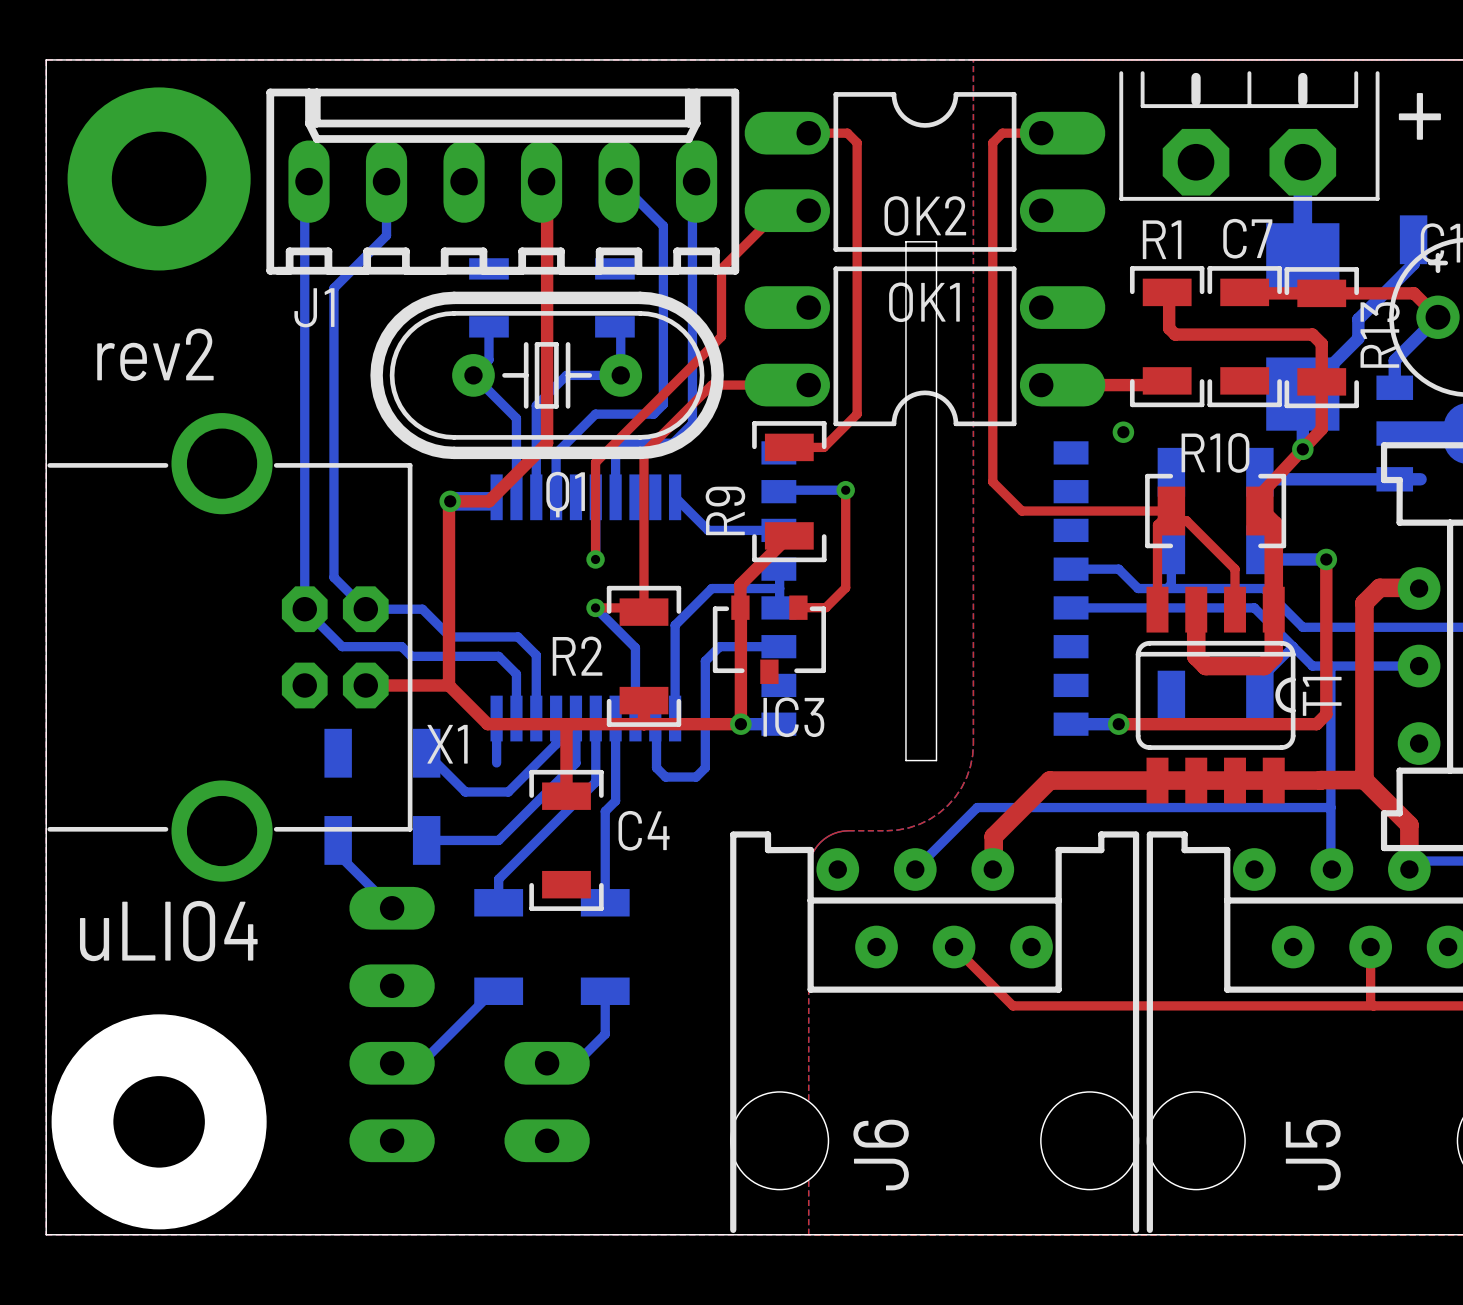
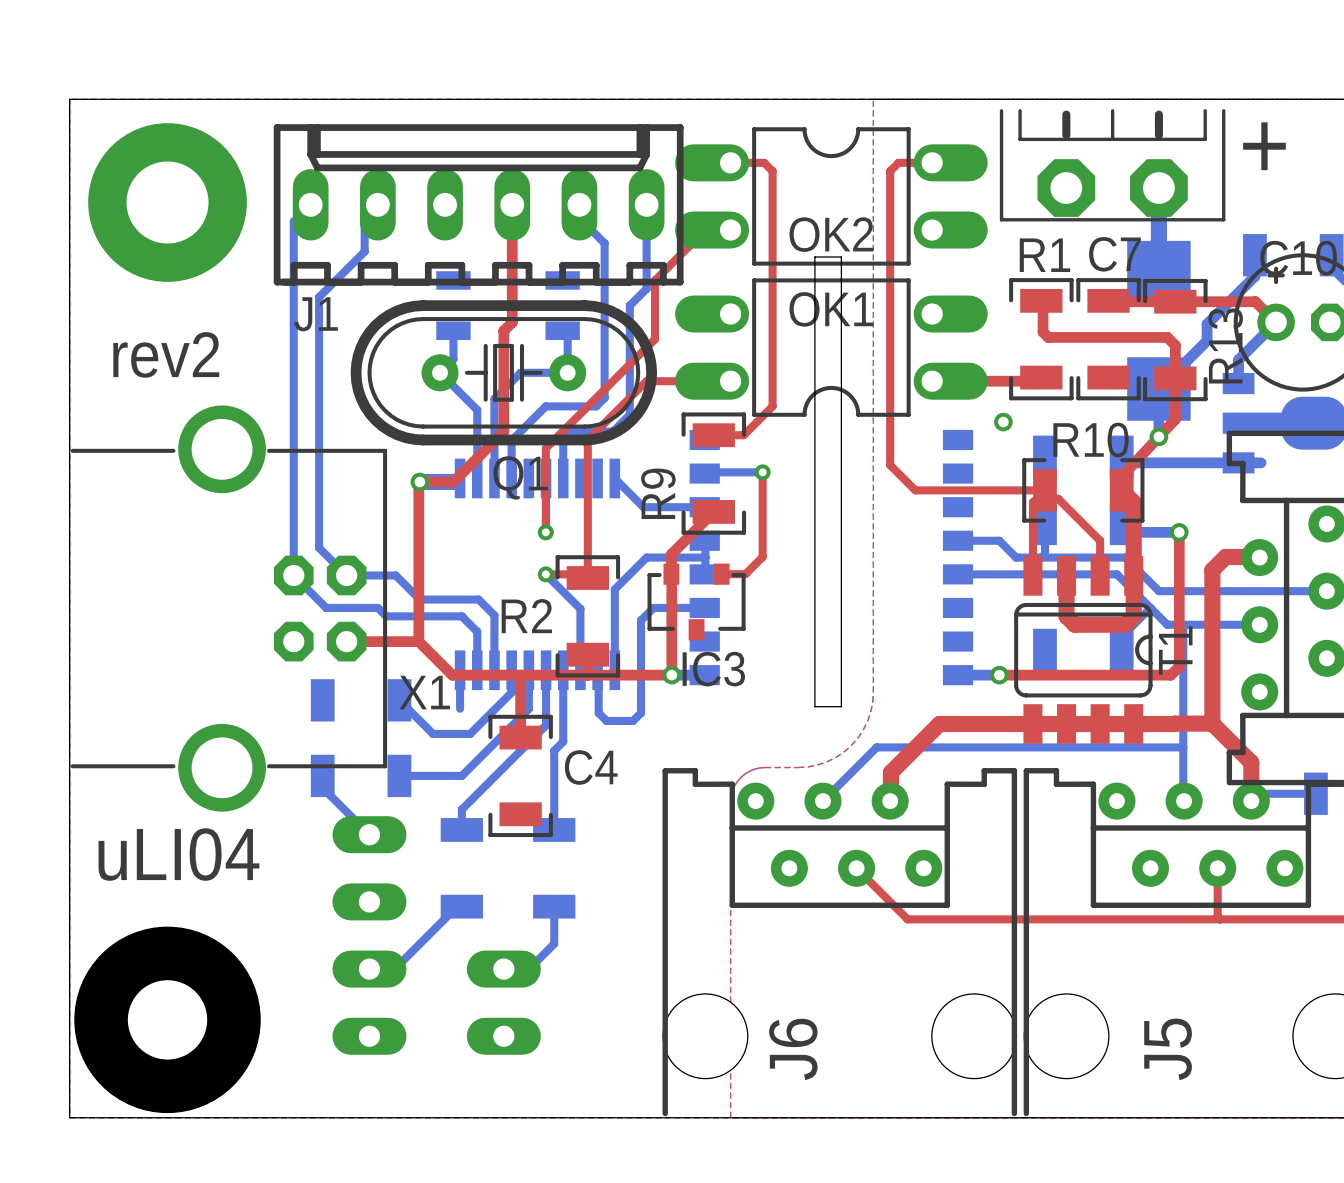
J1 position: (502, 181) -> (478, 204)
top track: (541, 181) (547, 187) (547, 326) -> (512, 204) (512, 322) (503, 330)
bottom track: (696, 181) (692, 185) (692, 297) -> (646, 204) (646, 288) (629, 305)

